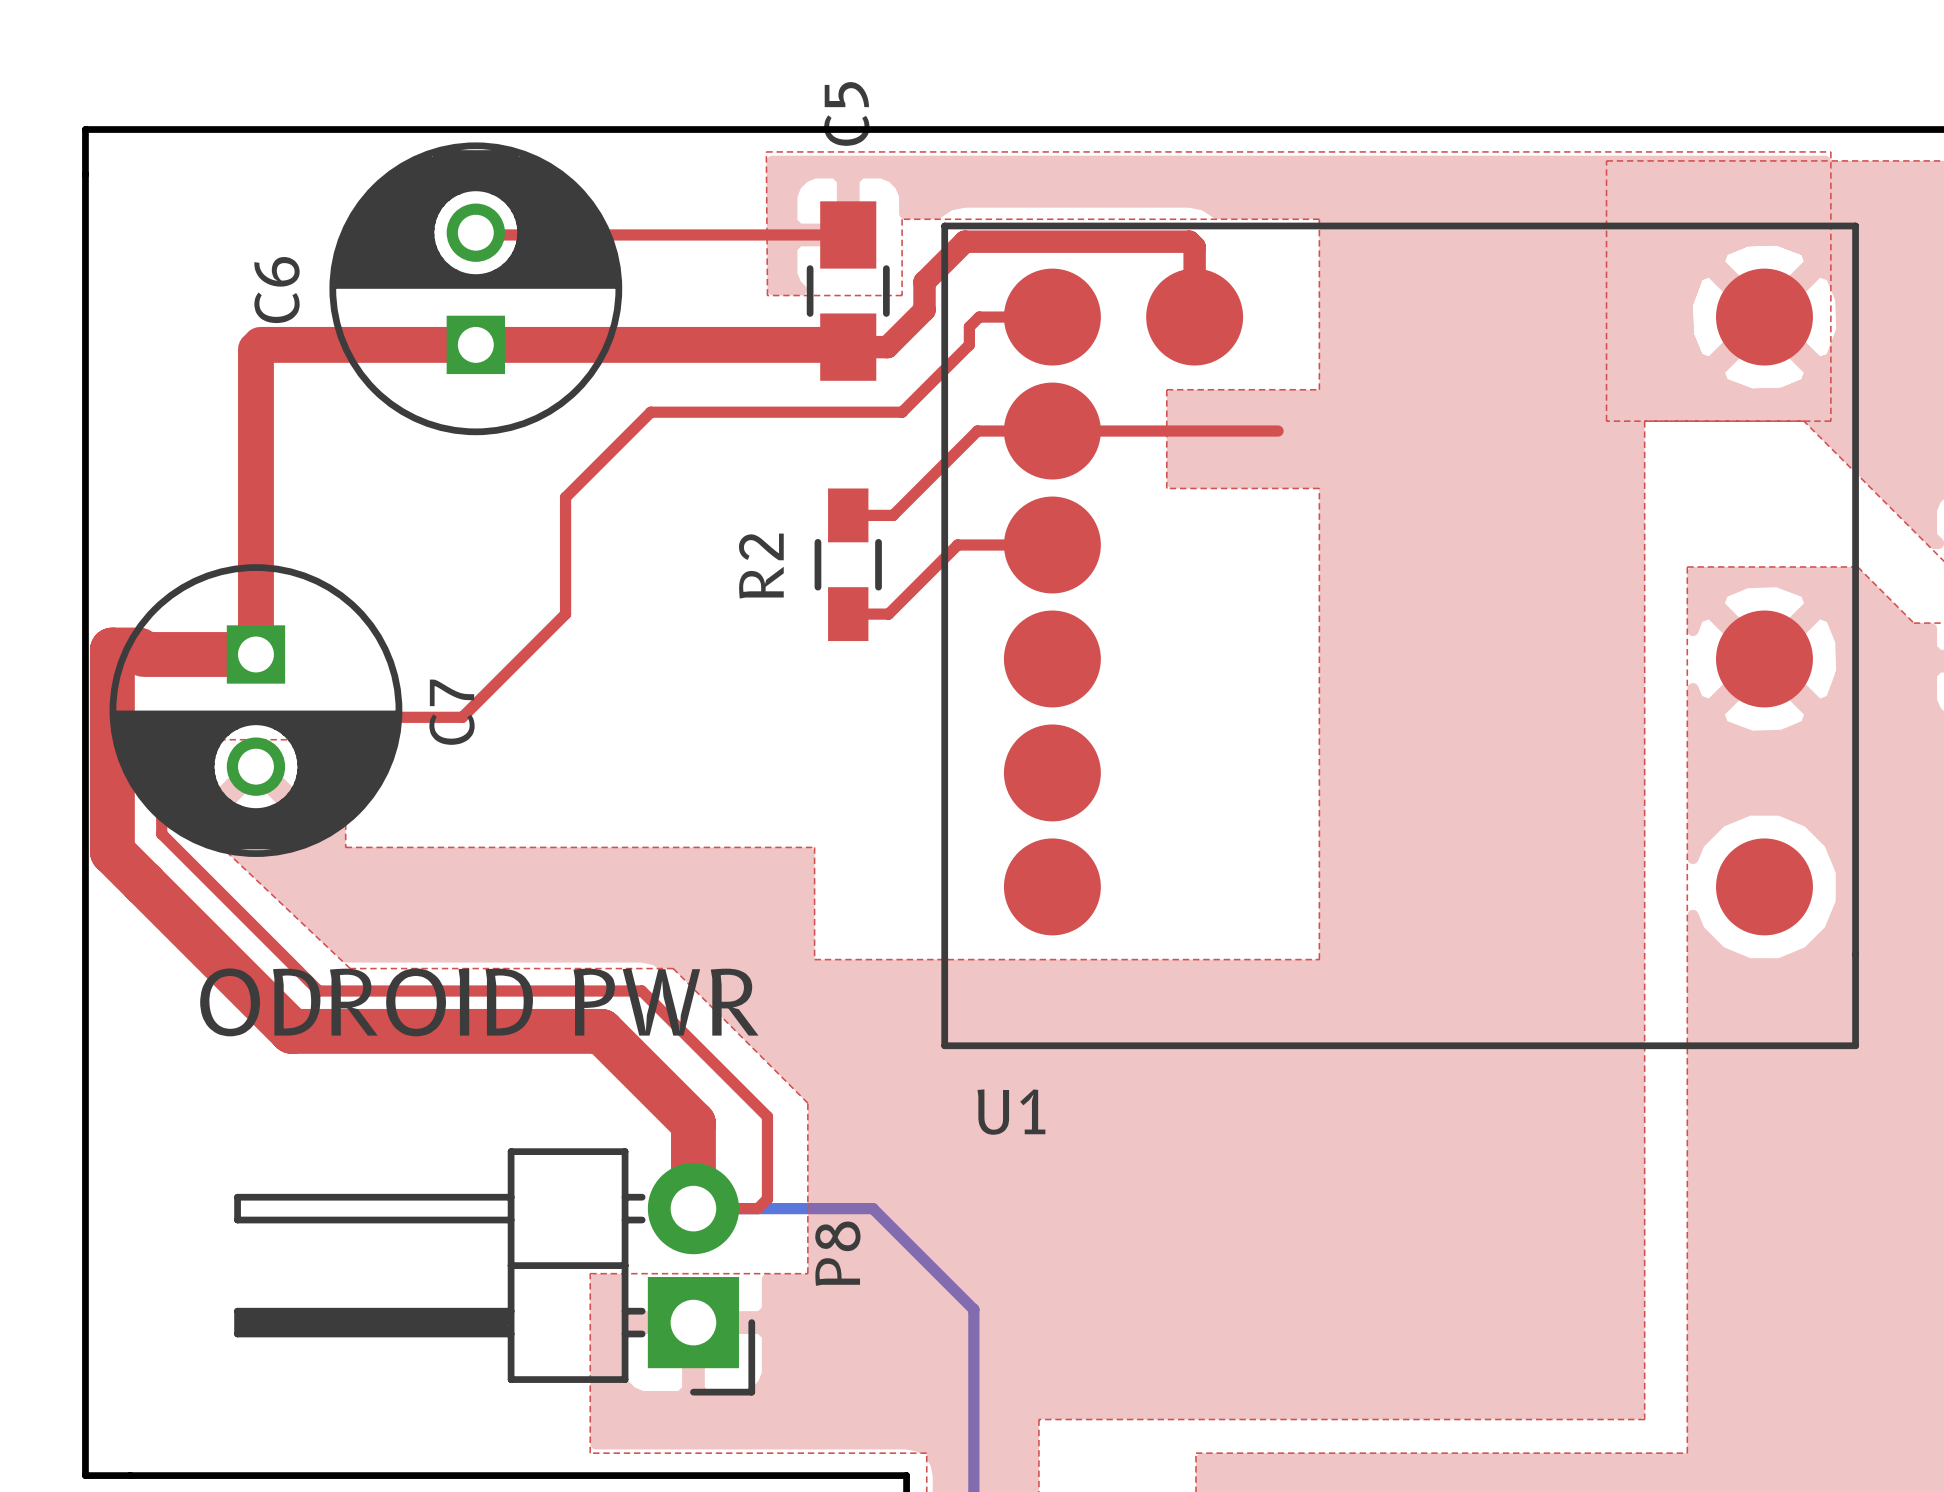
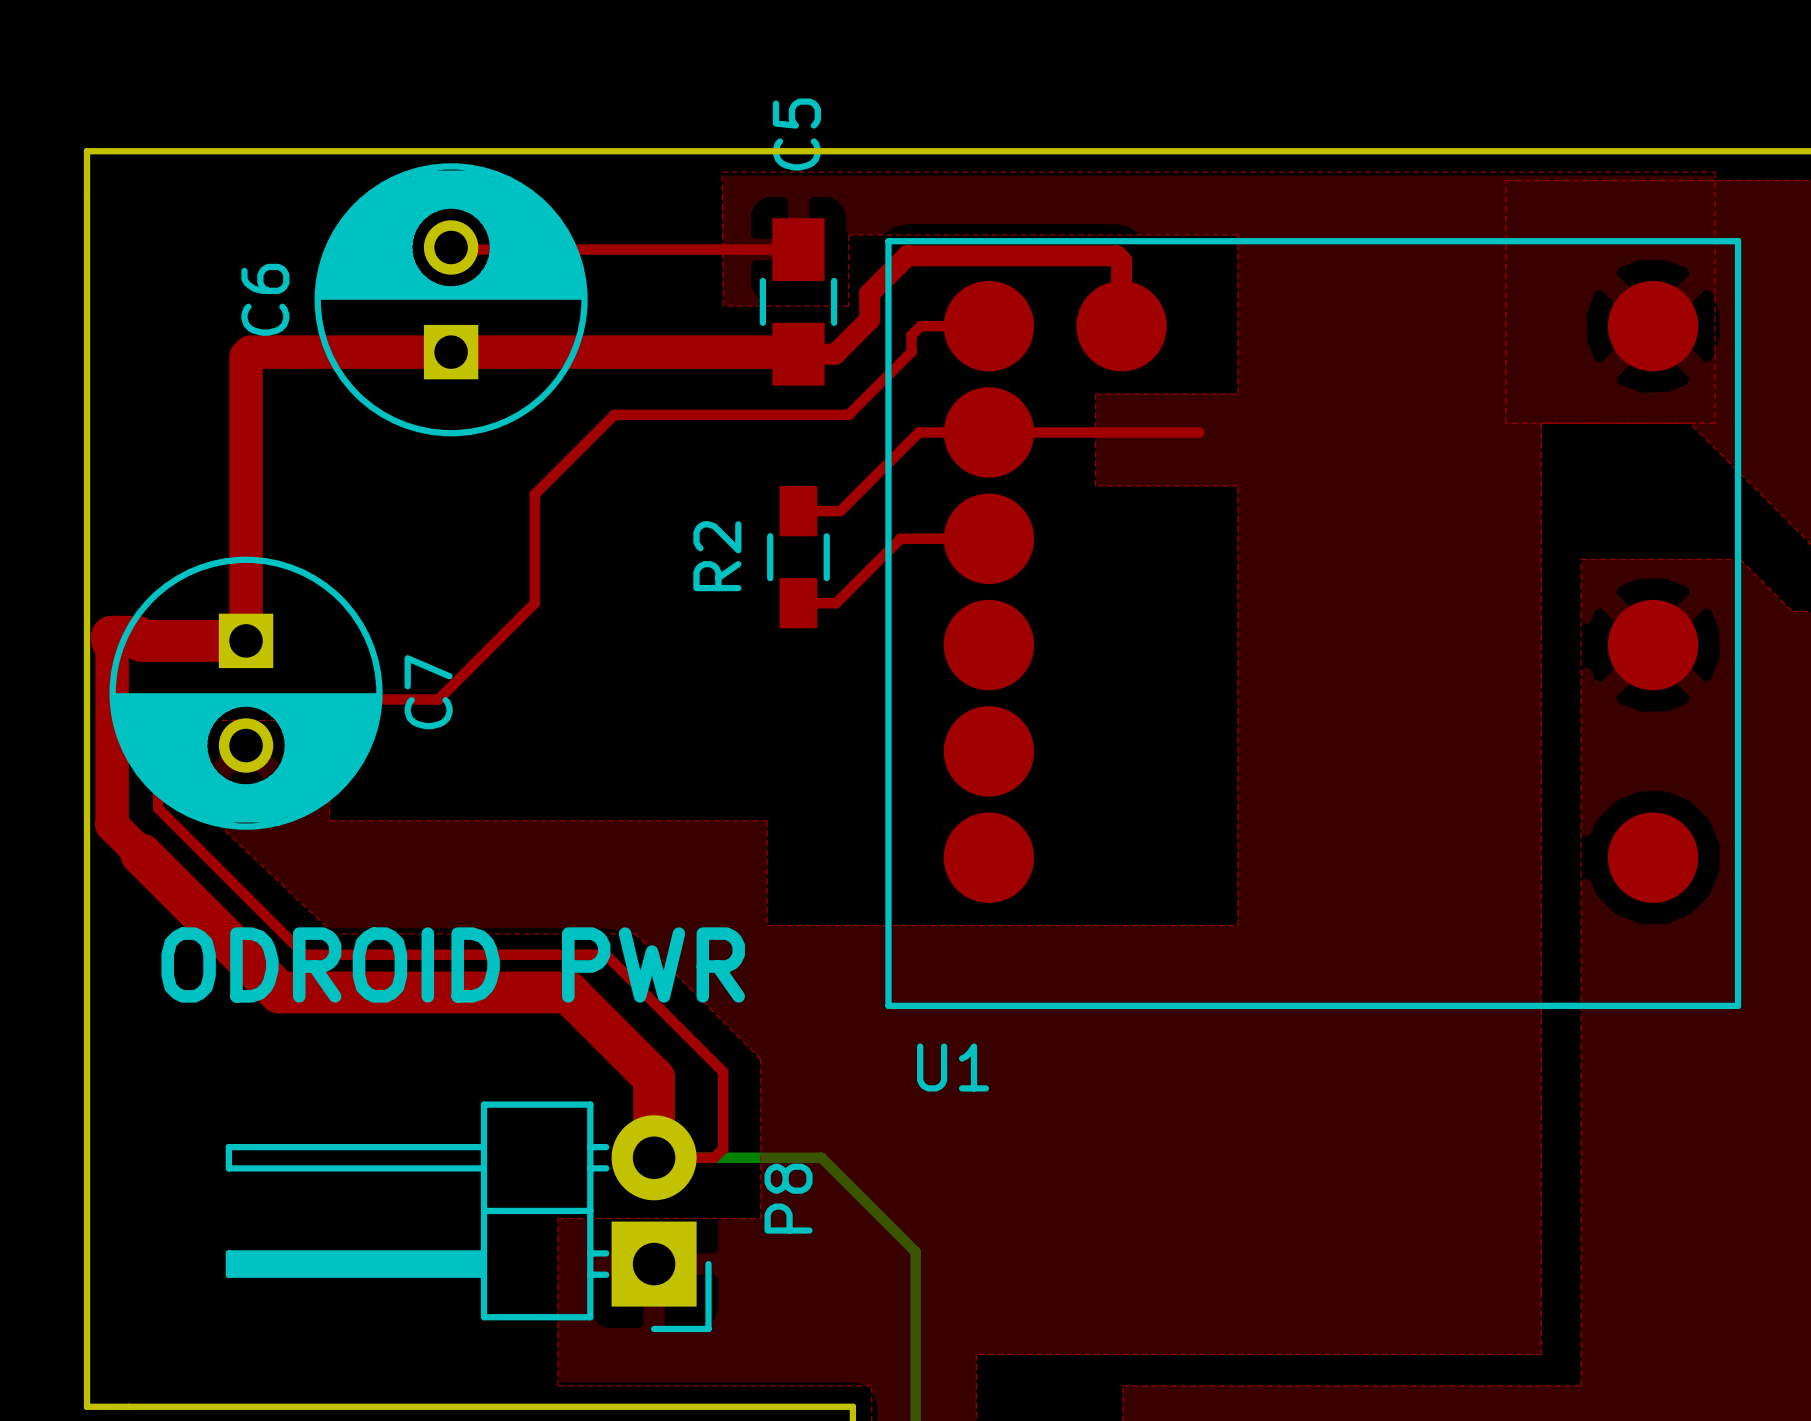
top track width: thick (112, 654) (112, 851) (143, 883) -> thin (112, 640) (112, 825) (141, 854)

